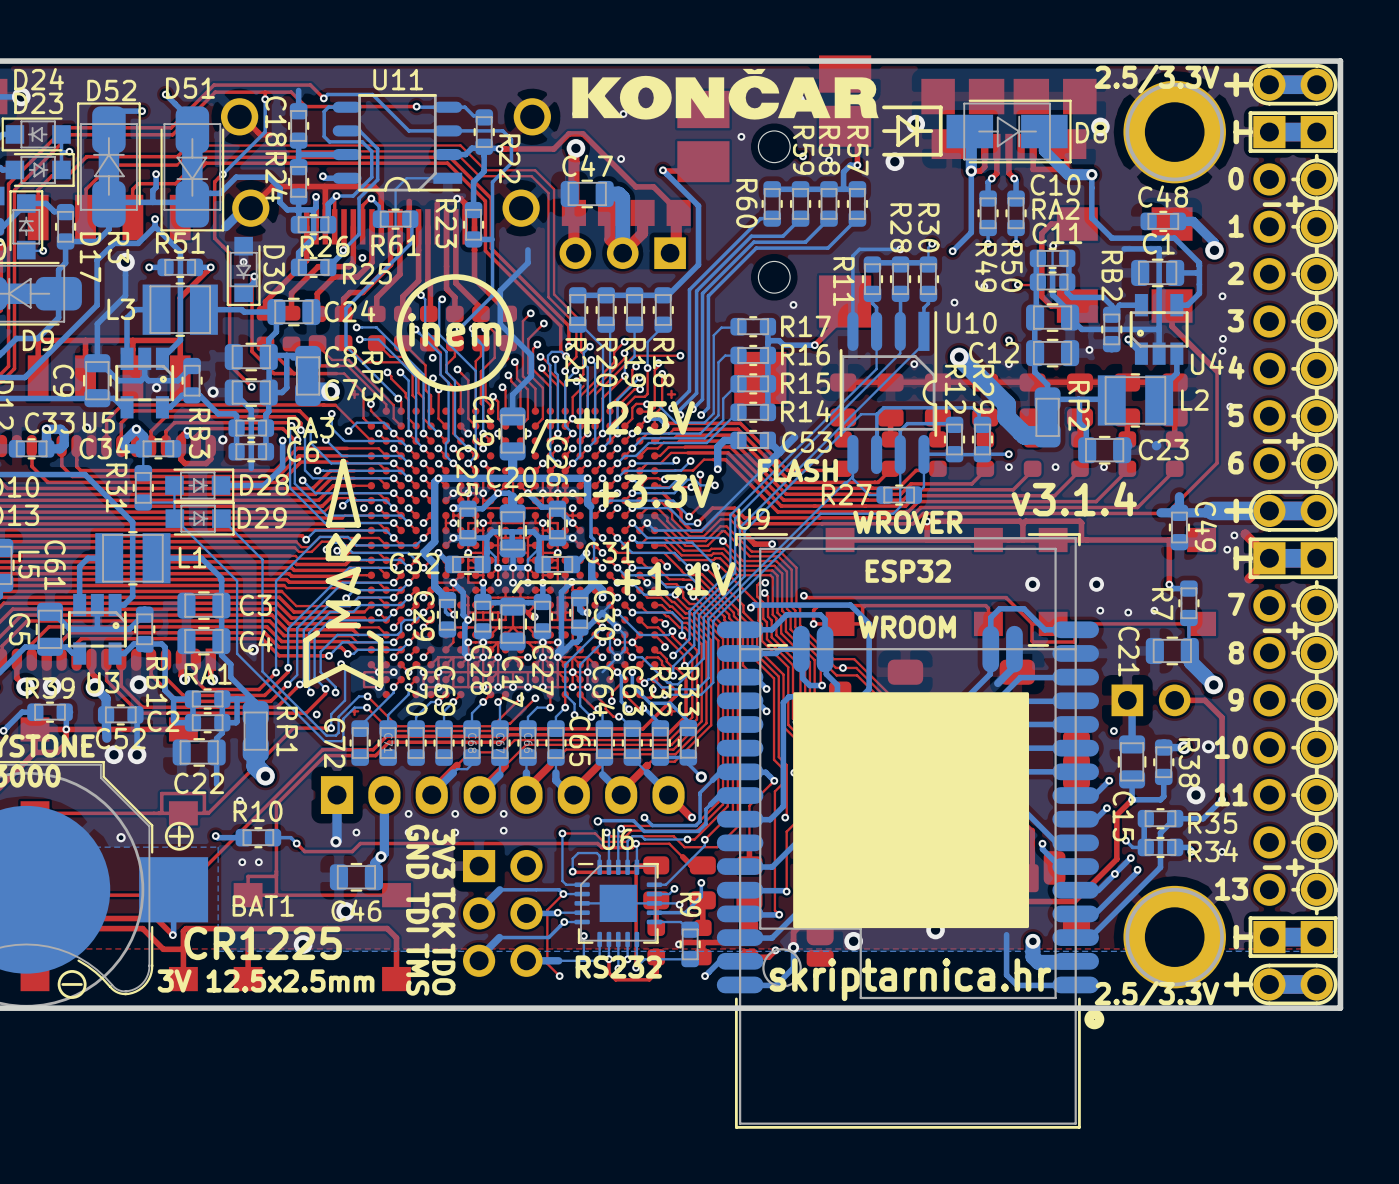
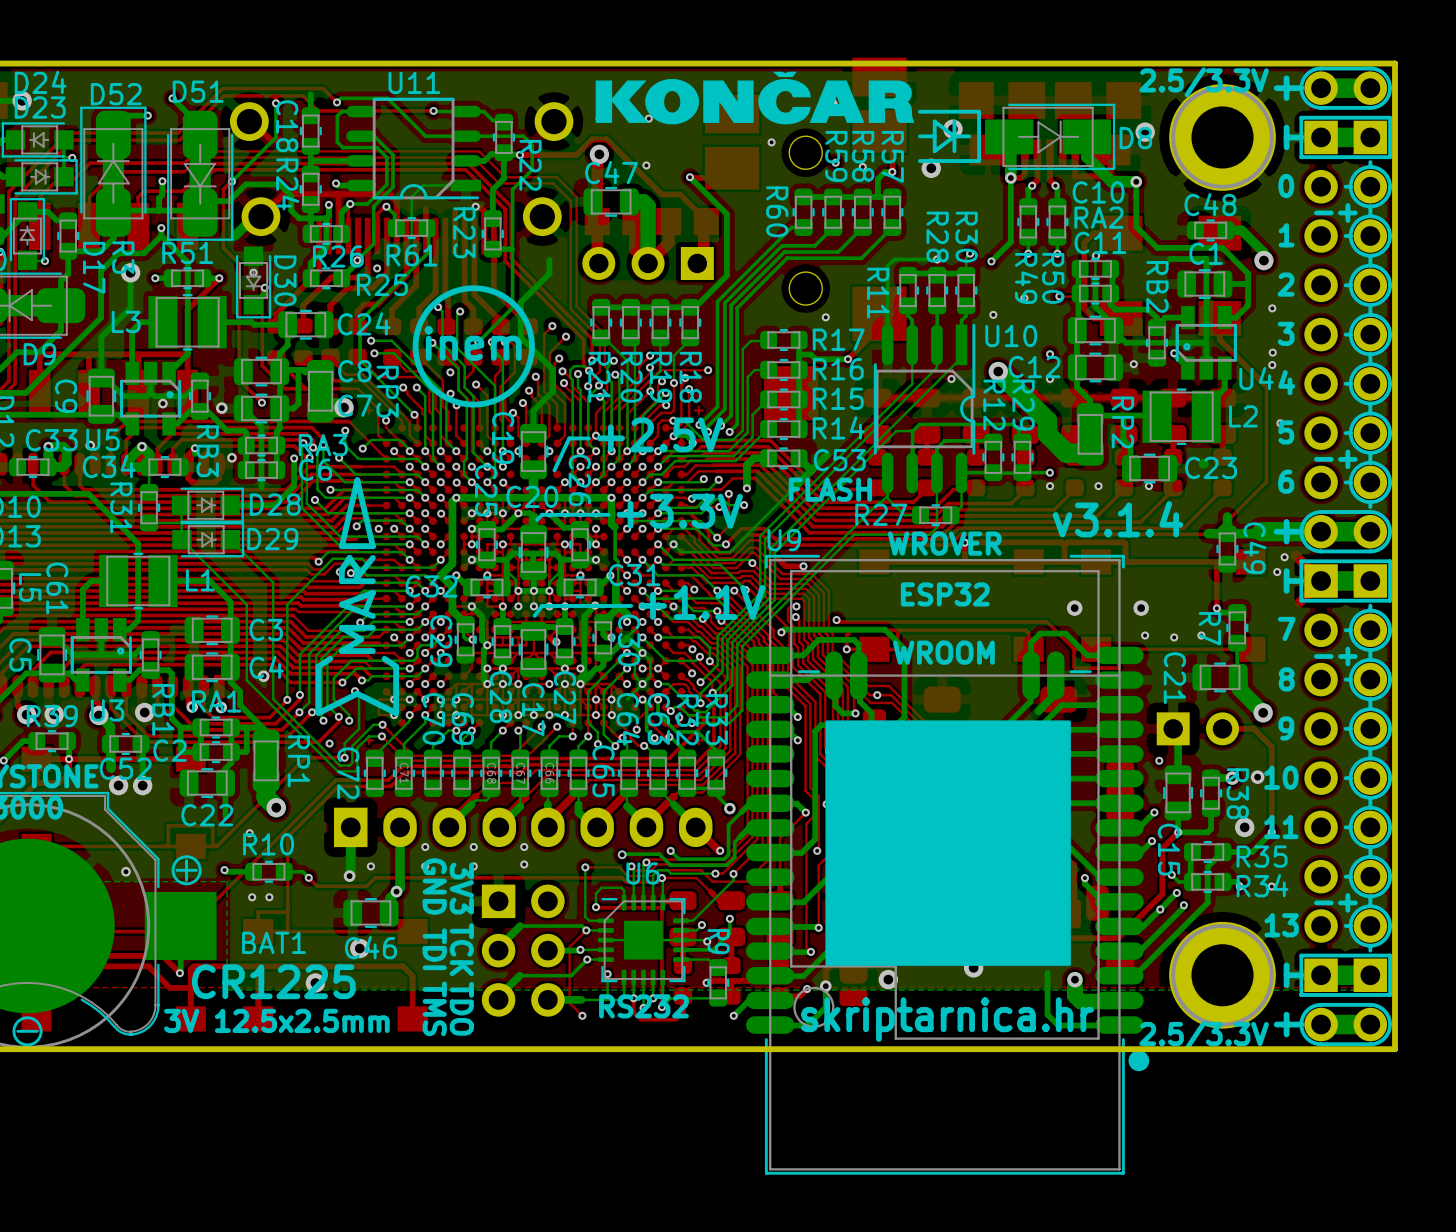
drawing: [57, 970, 87, 999] -> none
drawing: none -> [12, 1016, 43, 1047]
line: (81, 984) (62, 984) -> (37, 1031) (17, 1031)

